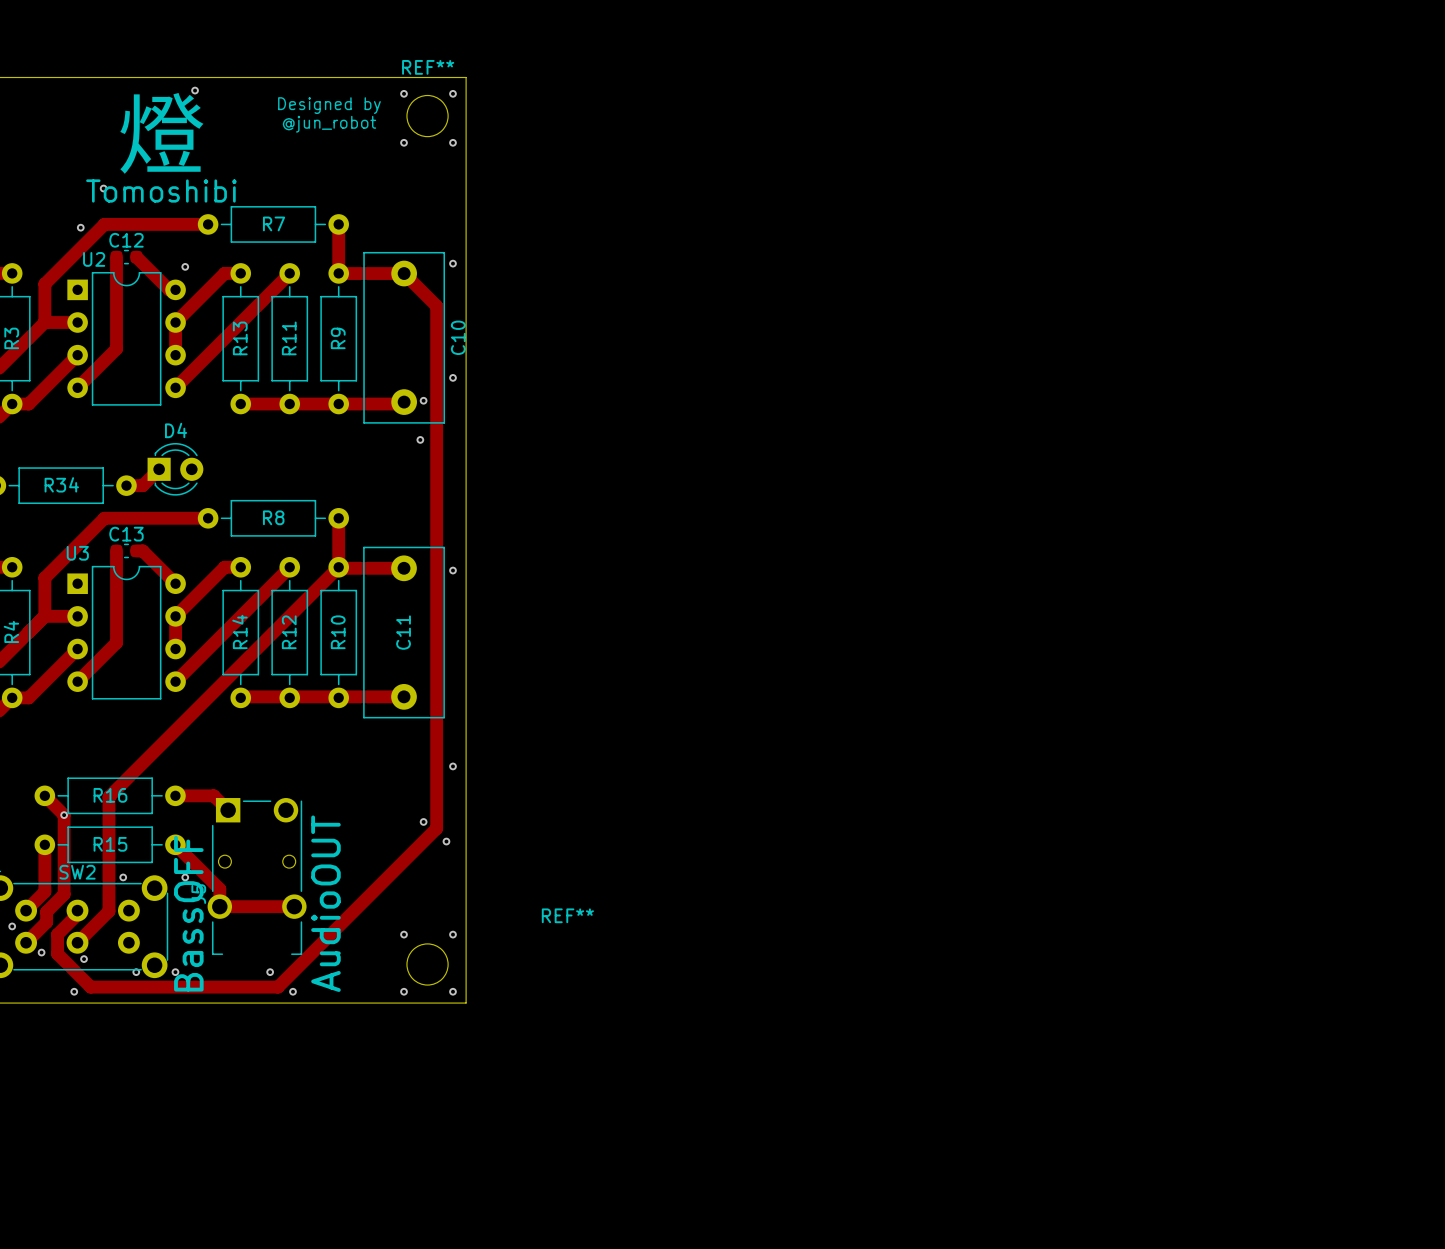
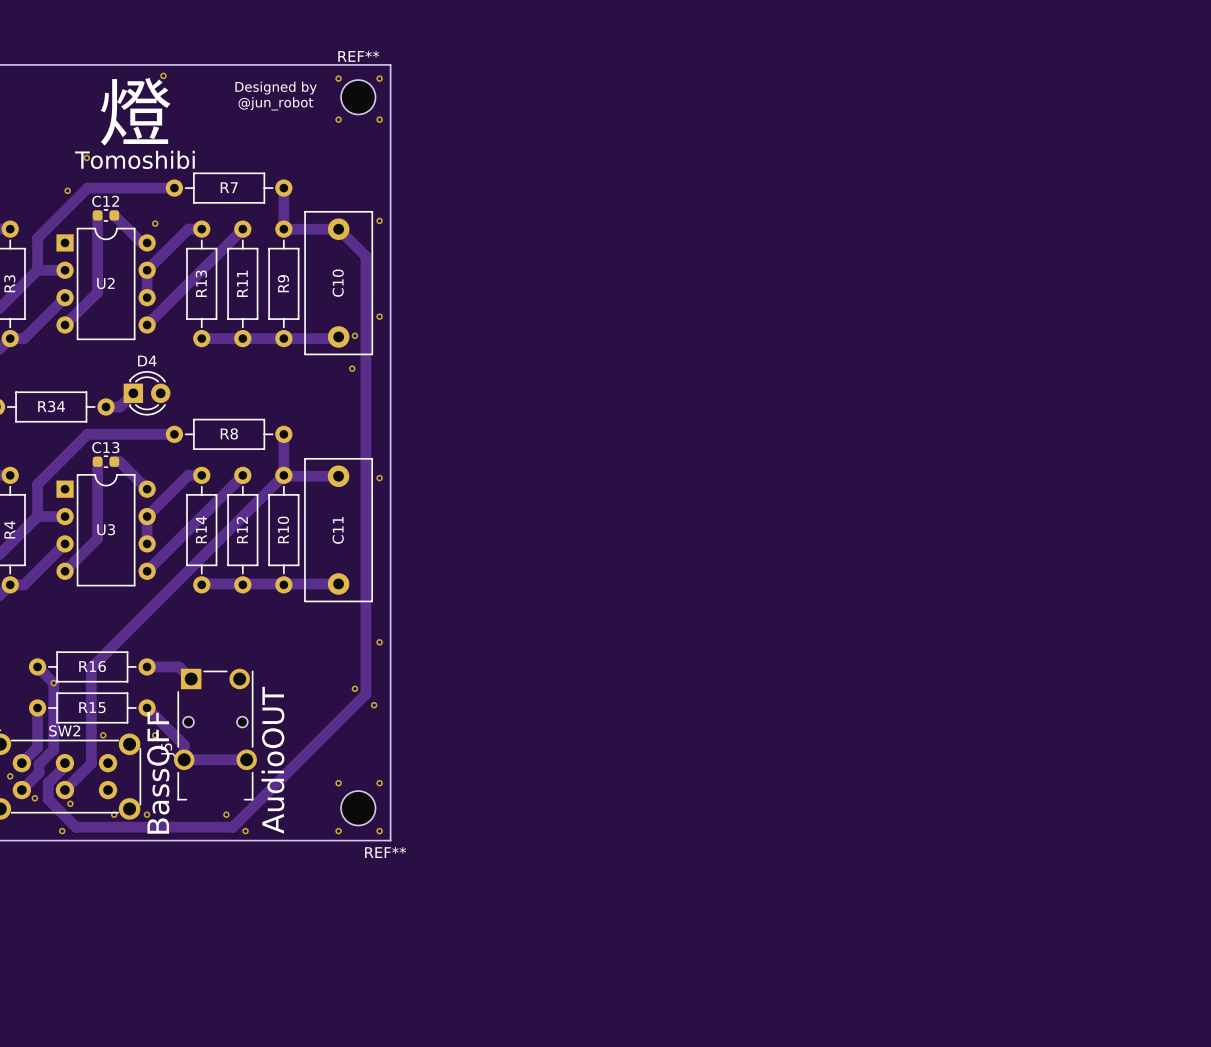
U2 name position: U2 (94, 259) -> U2 (105, 283)
C10 name position: C10 (458, 337) -> C10 (338, 283)
U3 name position: U3 (77, 553) -> U3 (106, 529)
REF** name position: REF** (567, 915) -> REF** (385, 852)

